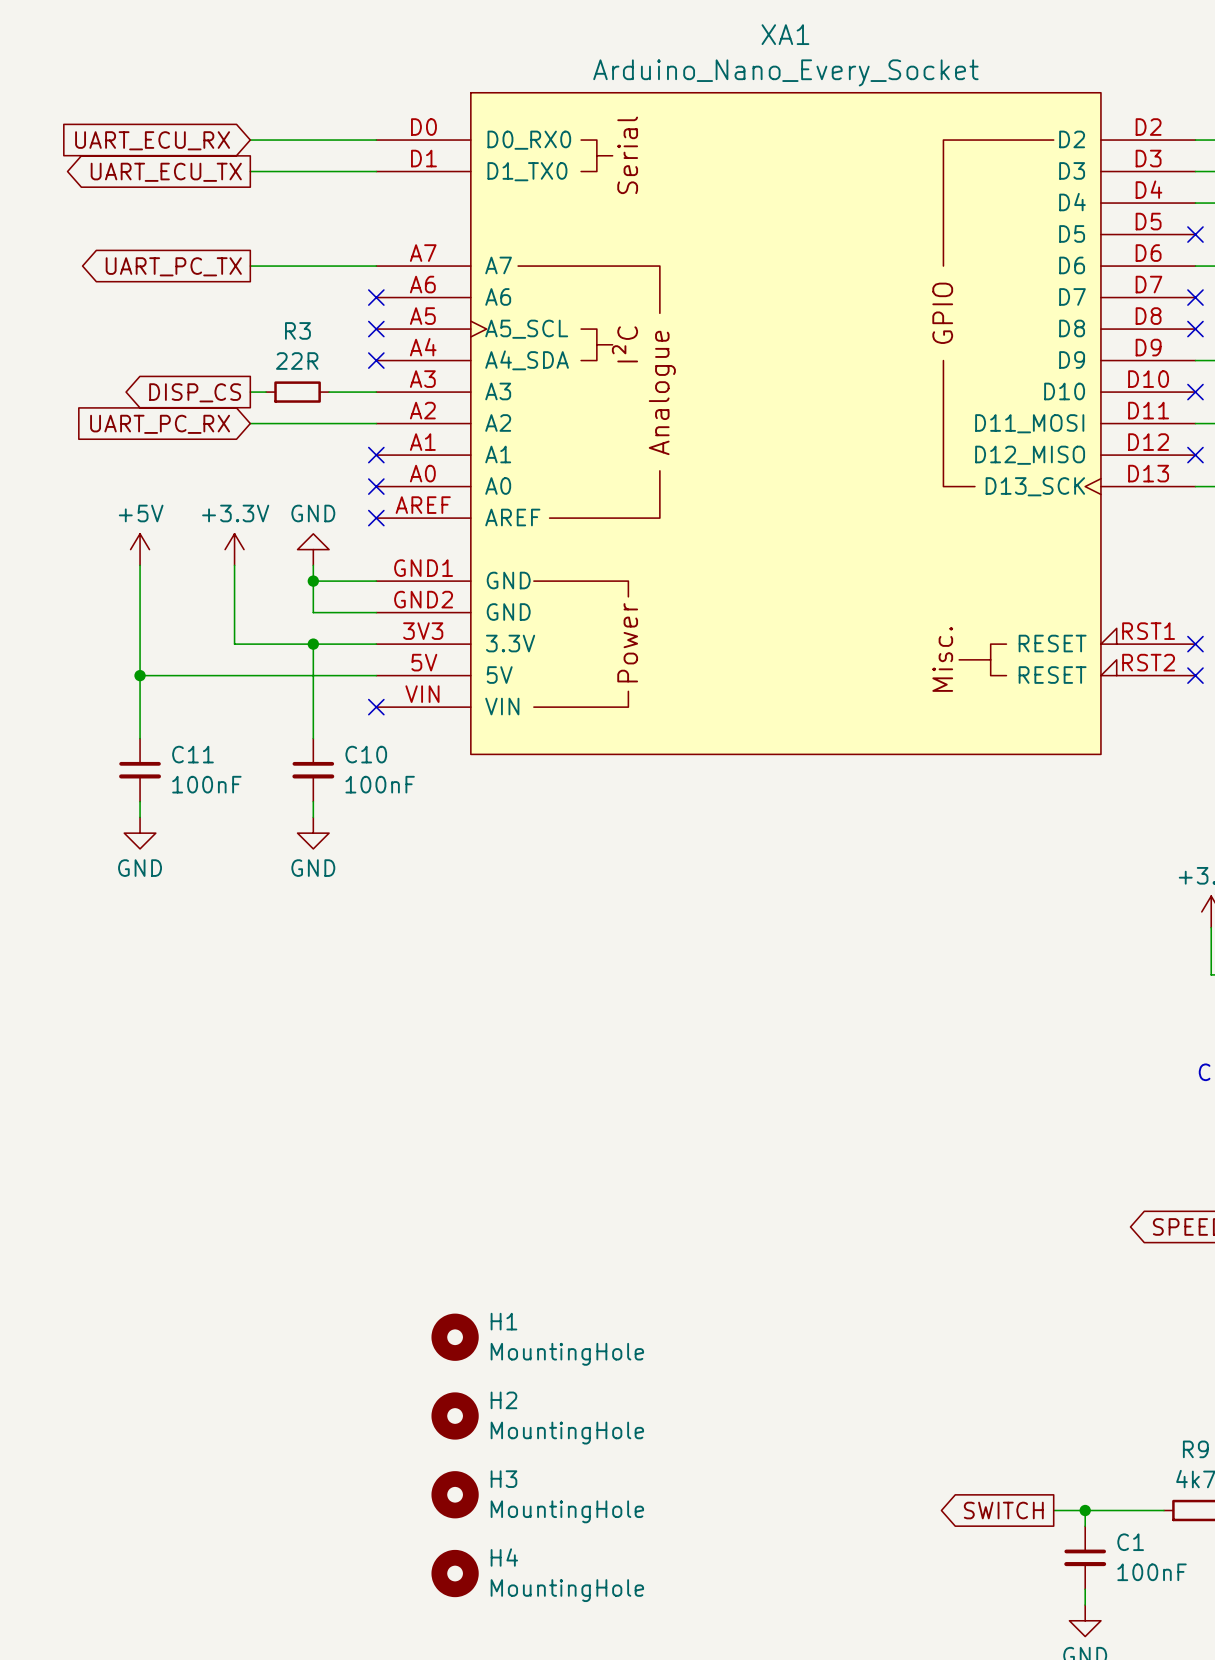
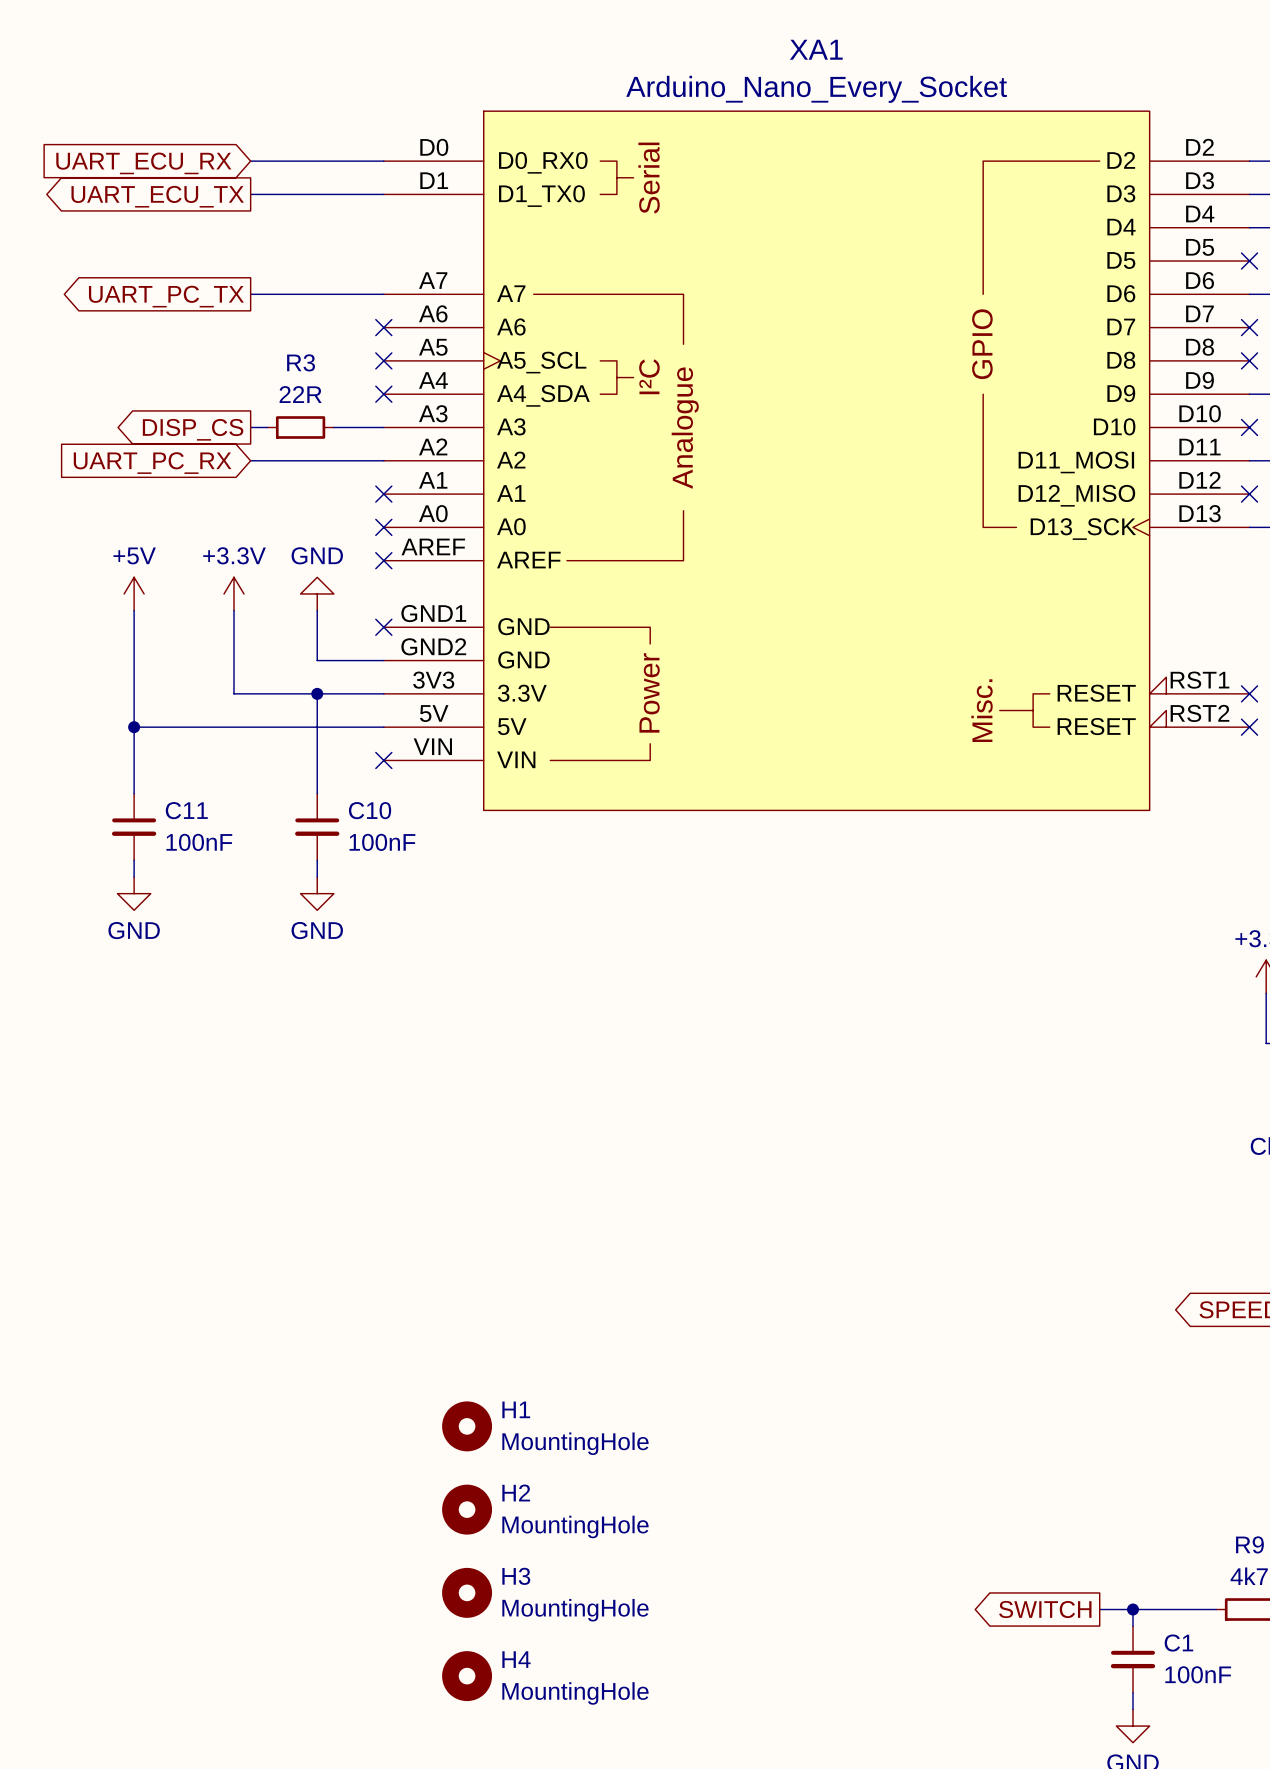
wire: (313, 581) (376, 581) -> none
junction: (313, 581) -> none
no-connect mark: none -> (383, 627)

